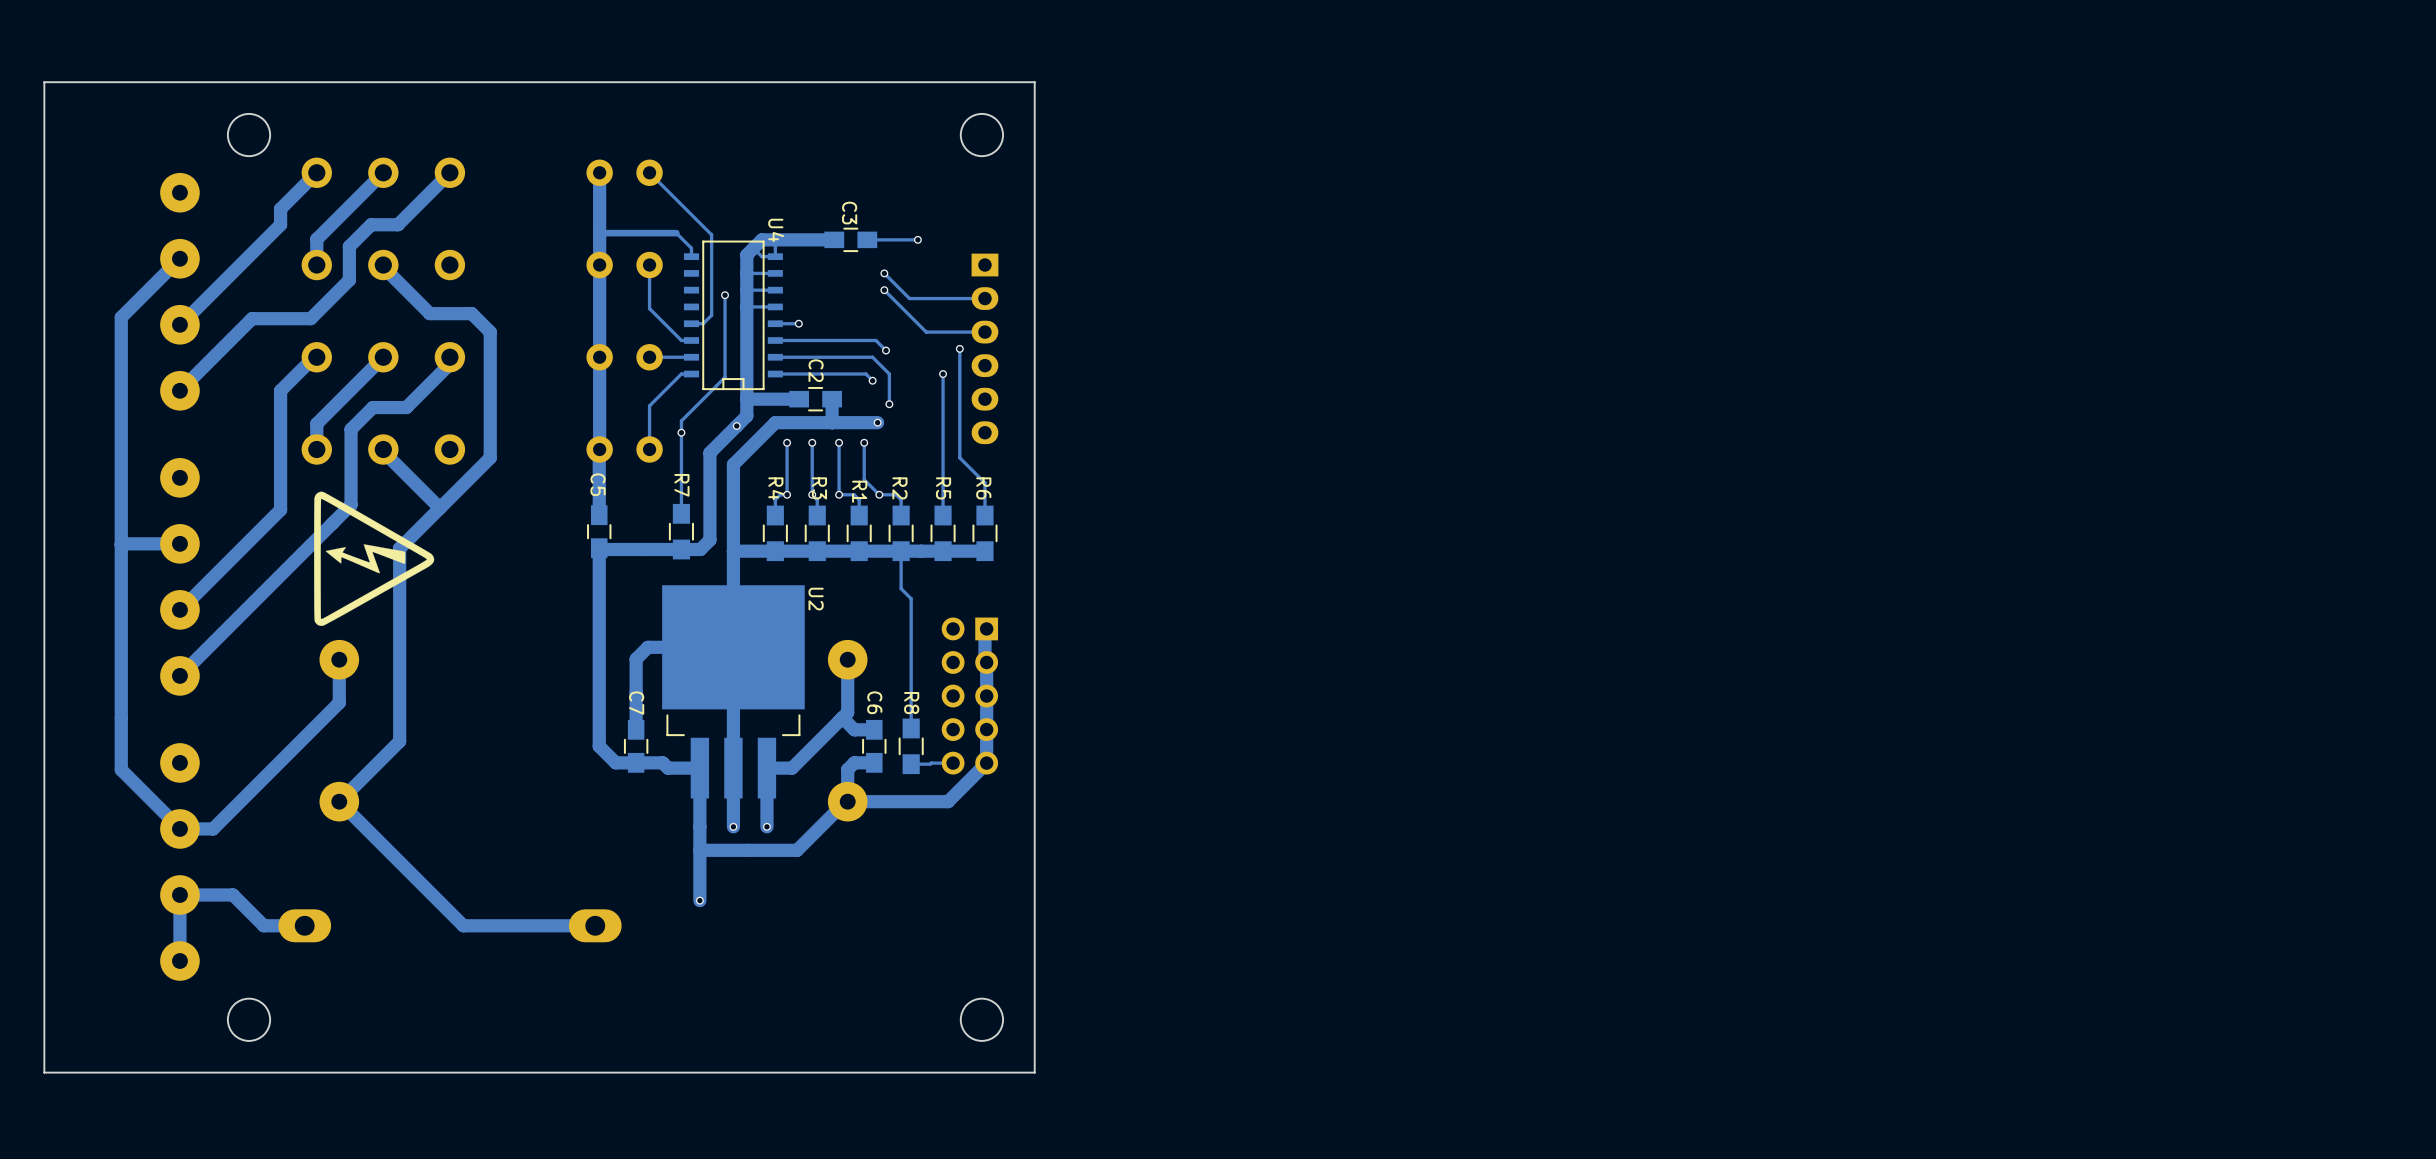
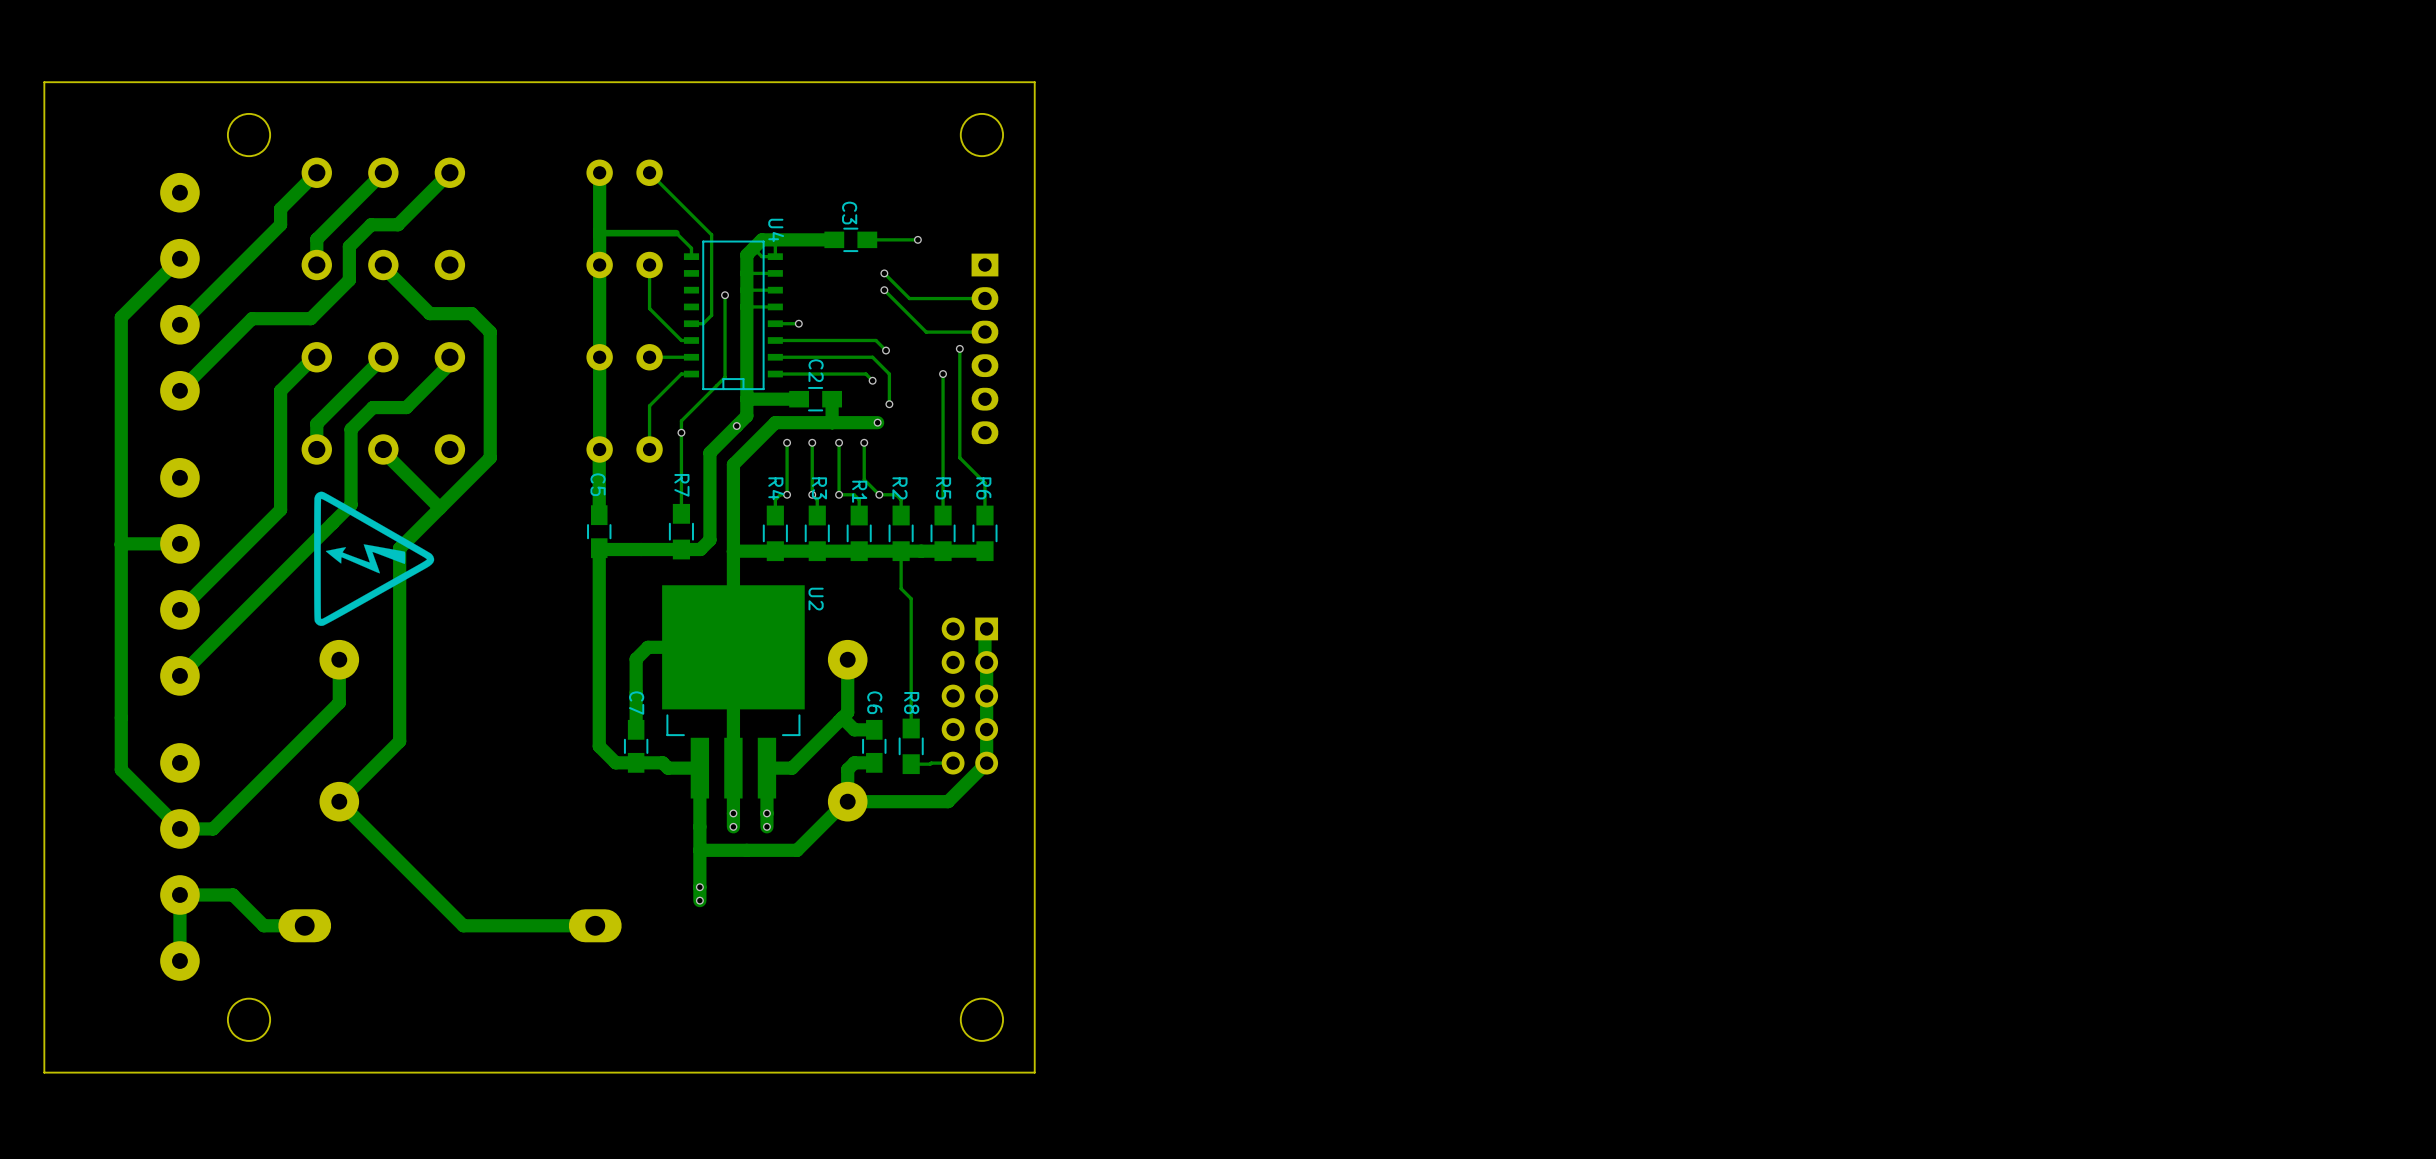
via: none -> (733, 813)
via: none -> (766, 813)
via: none -> (699, 887)

